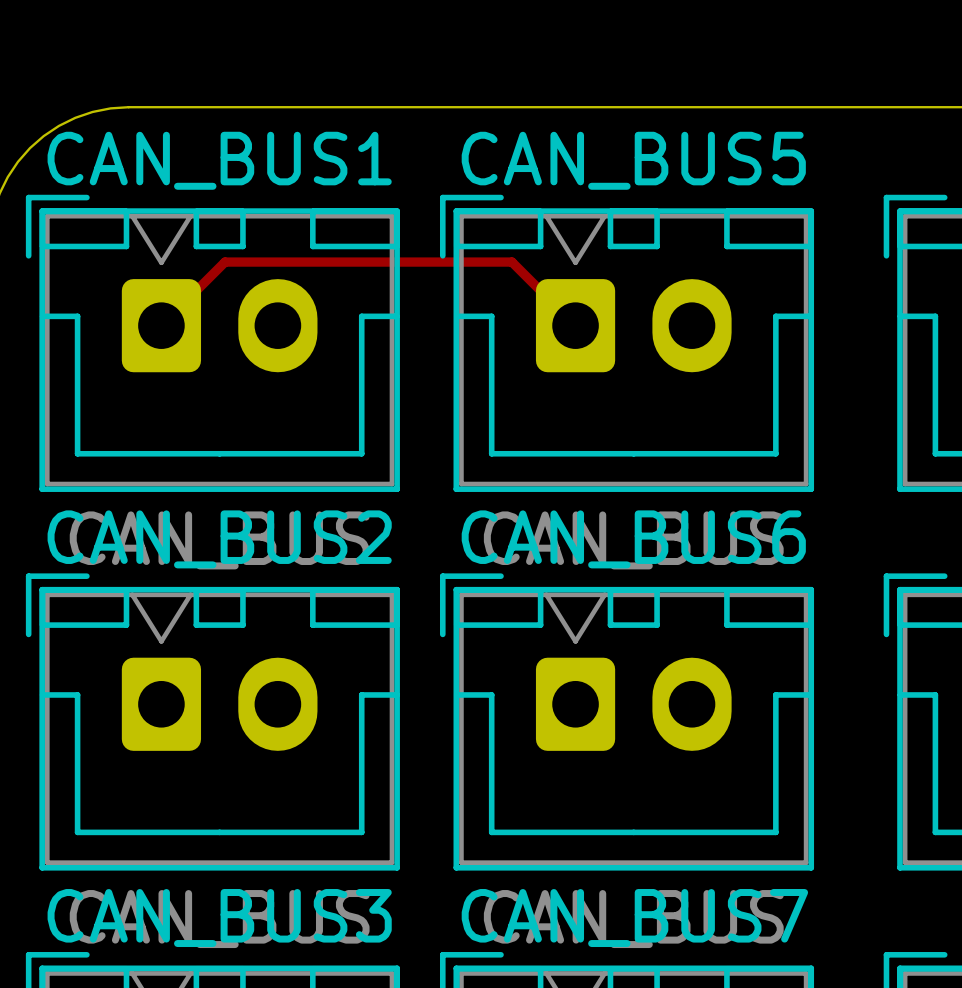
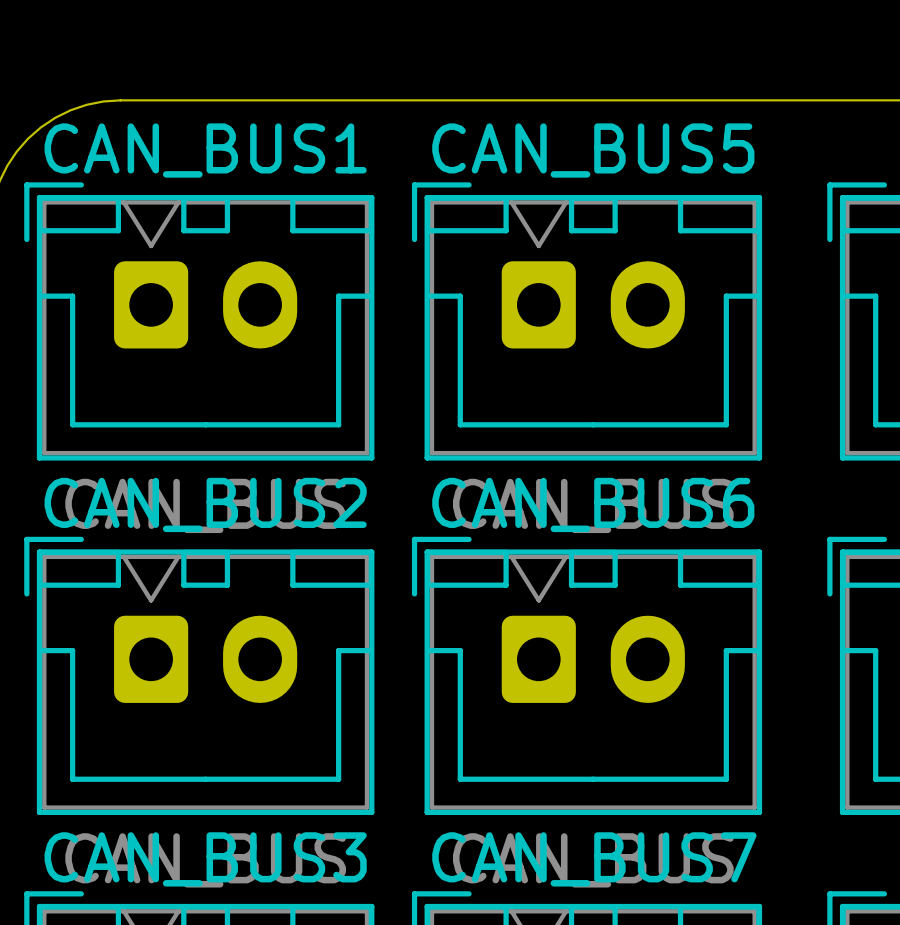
track: (161, 325) (225, 262) (511, 262) (575, 325) -> none

